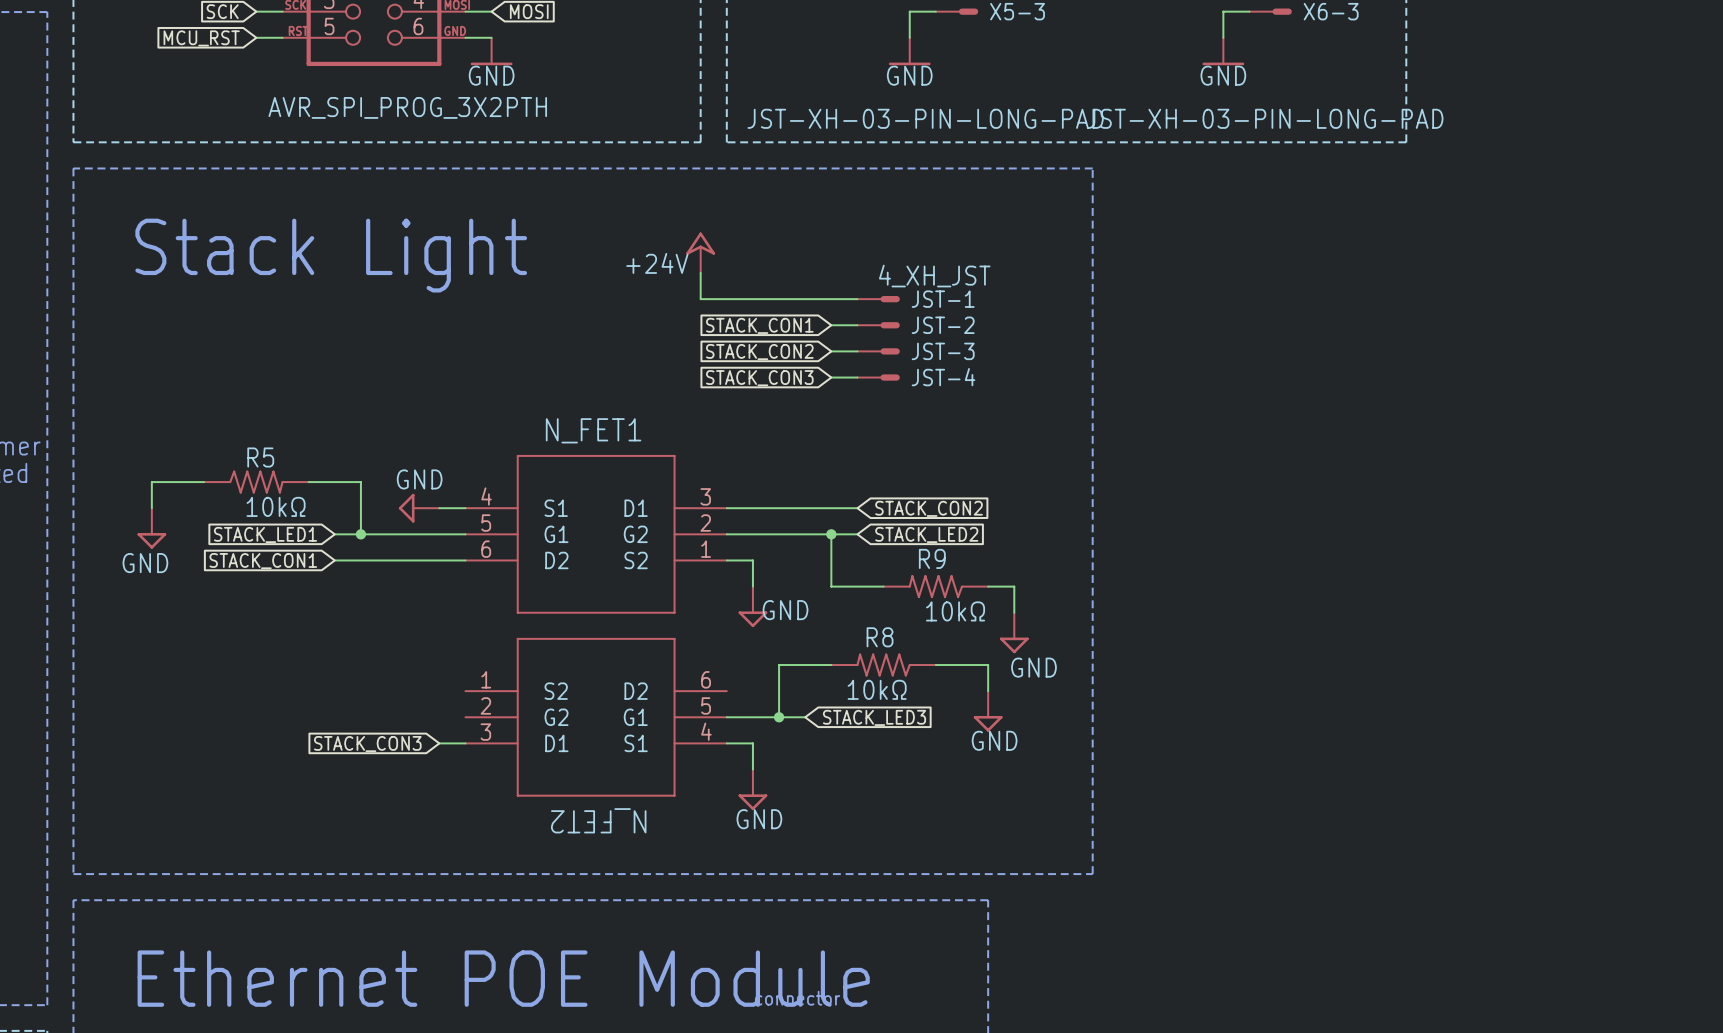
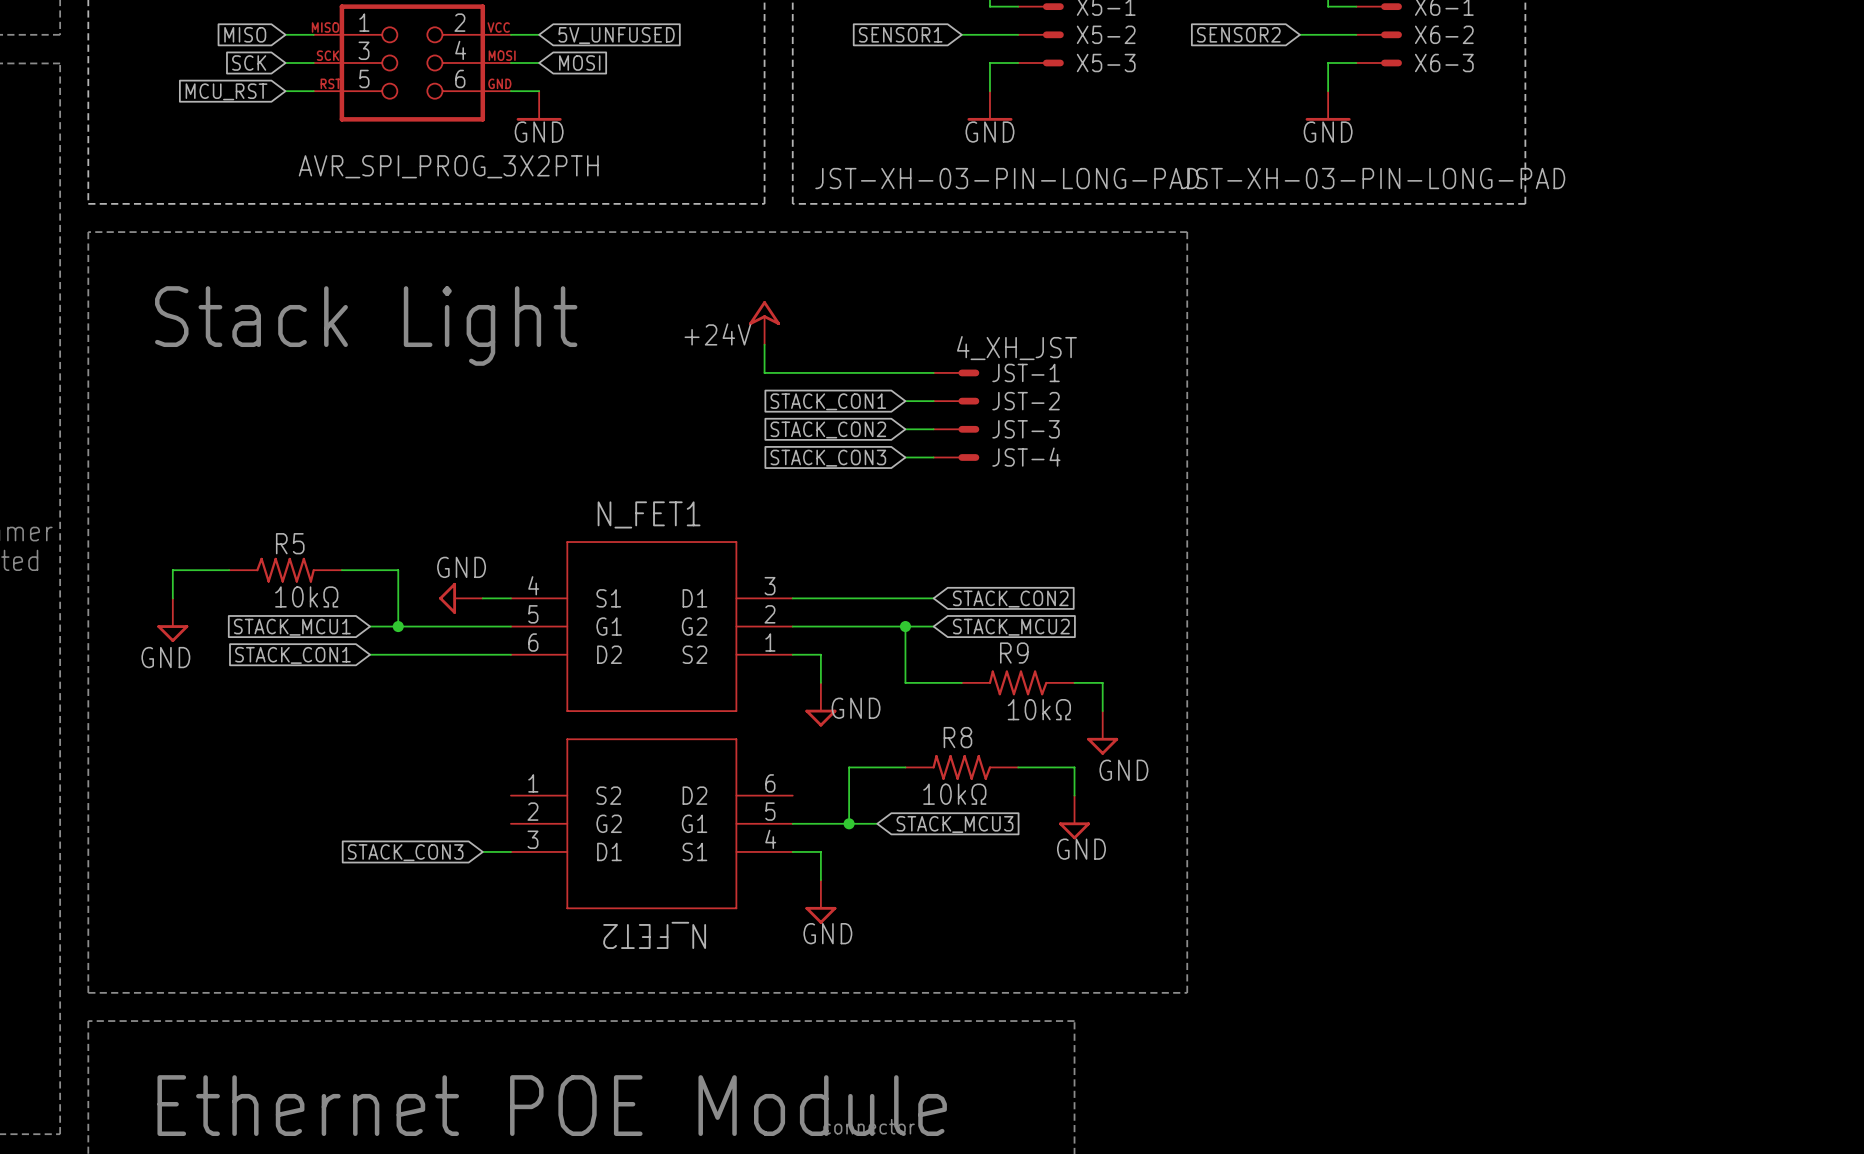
global label: STACK_LED1 (265, 534) -> STACK_MCU1 (292, 627)
global label: STACK_LED2 (926, 534) -> STACK_MCU2 (1011, 627)
global label: STACK_LED3 (874, 717) -> STACK_MCU3 (955, 824)

